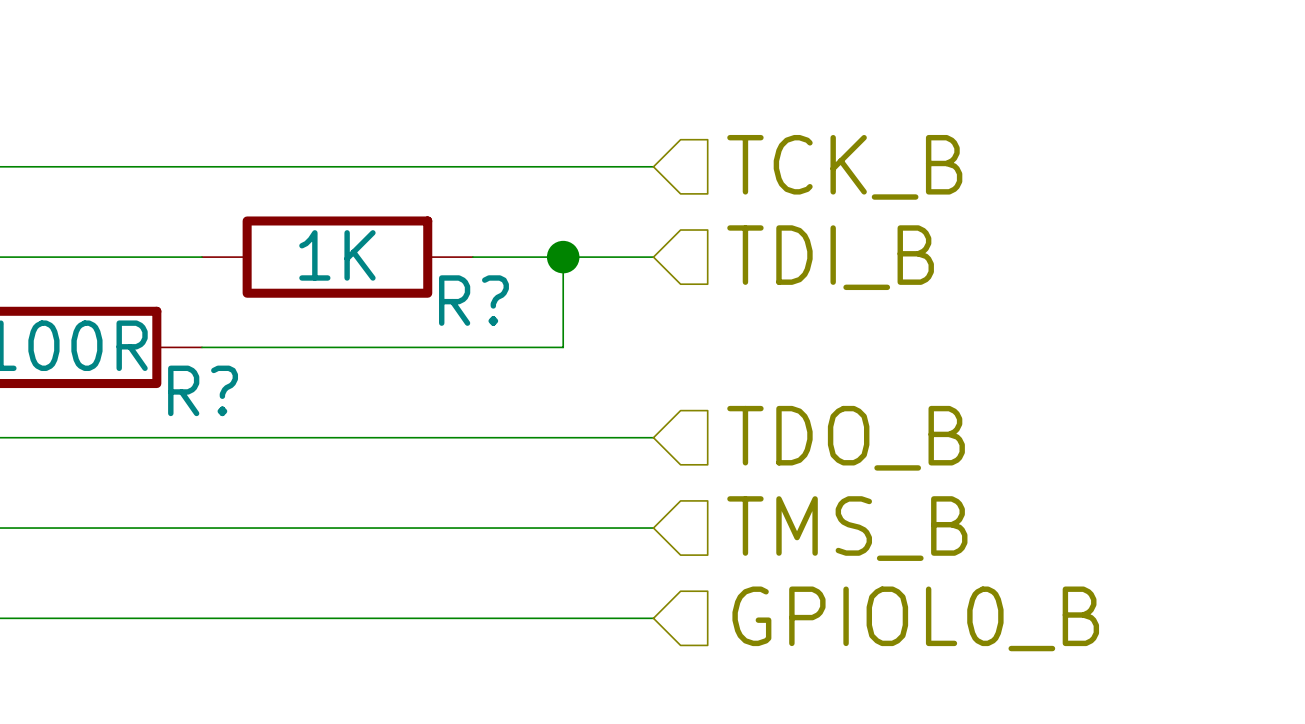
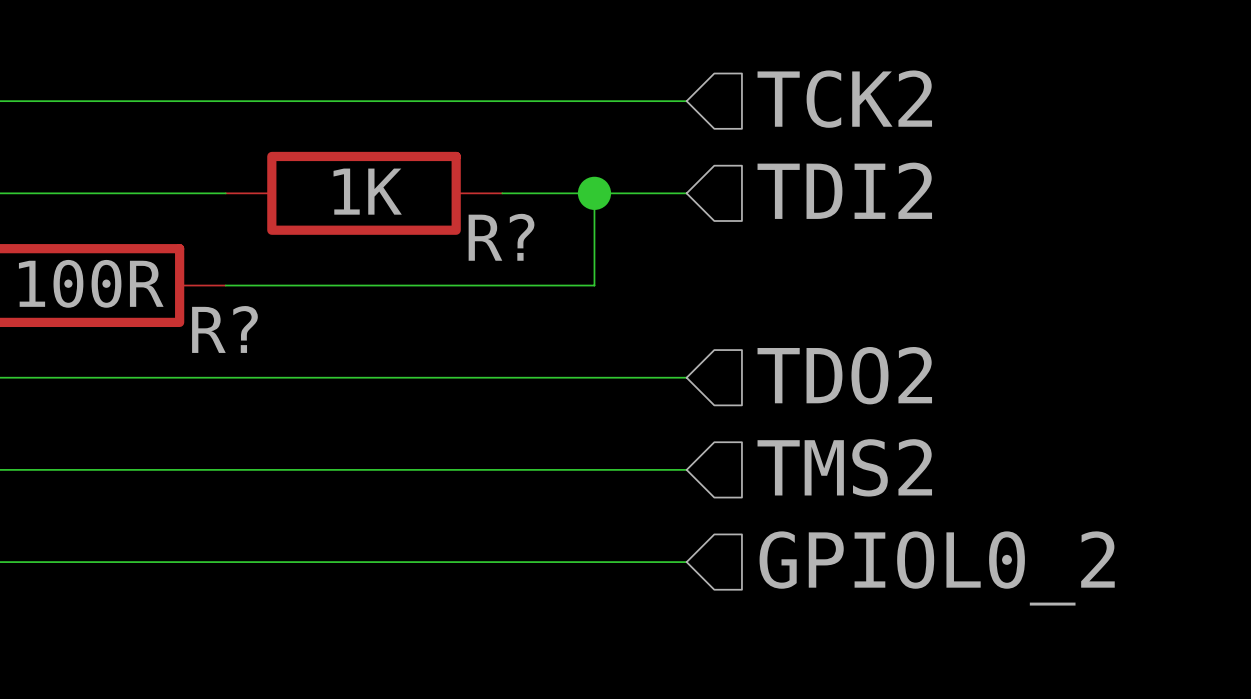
hierarchical label: TCK_B (844, 167) -> TCK2 (844, 99)
hierarchical label: TDI_B (830, 257) -> TDI2 (844, 190)
hierarchical label: TDO_B (846, 438) -> TDO2 (844, 375)
hierarchical label: TMS_B (847, 528) -> TMS2 (844, 467)
hierarchical label: GPIOL0_B (915, 618) -> GPIOL0_2 (937, 568)

